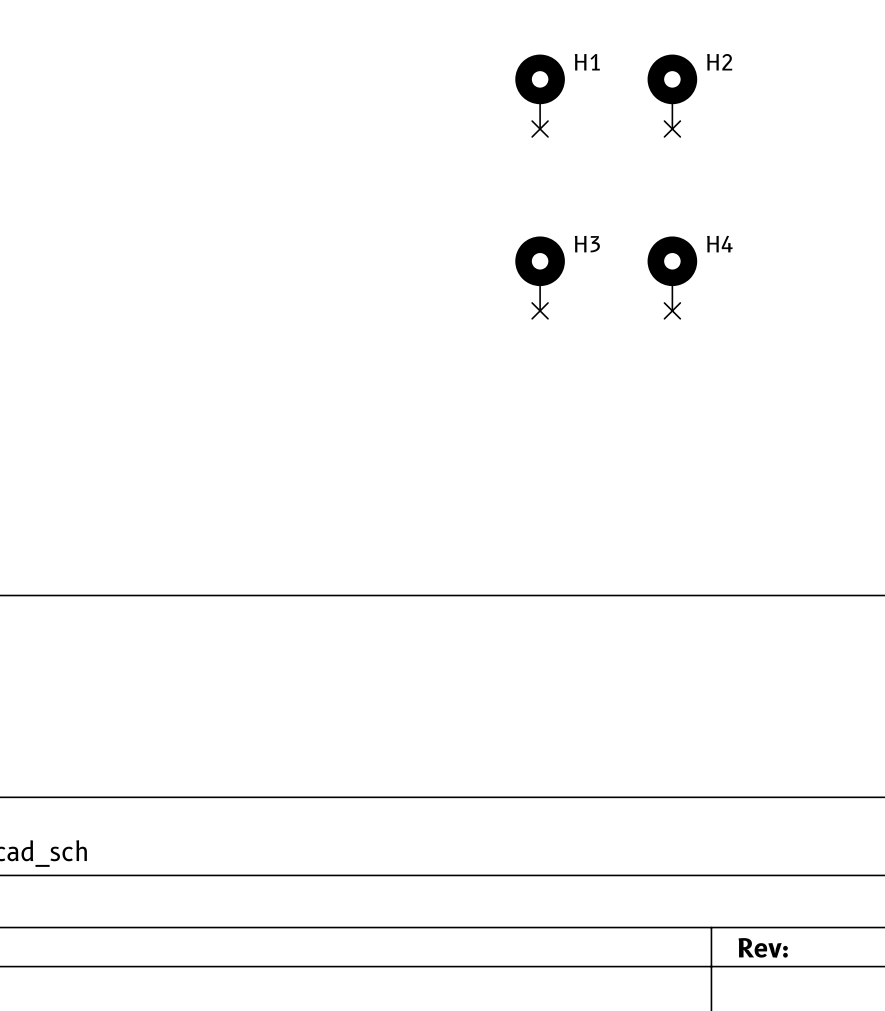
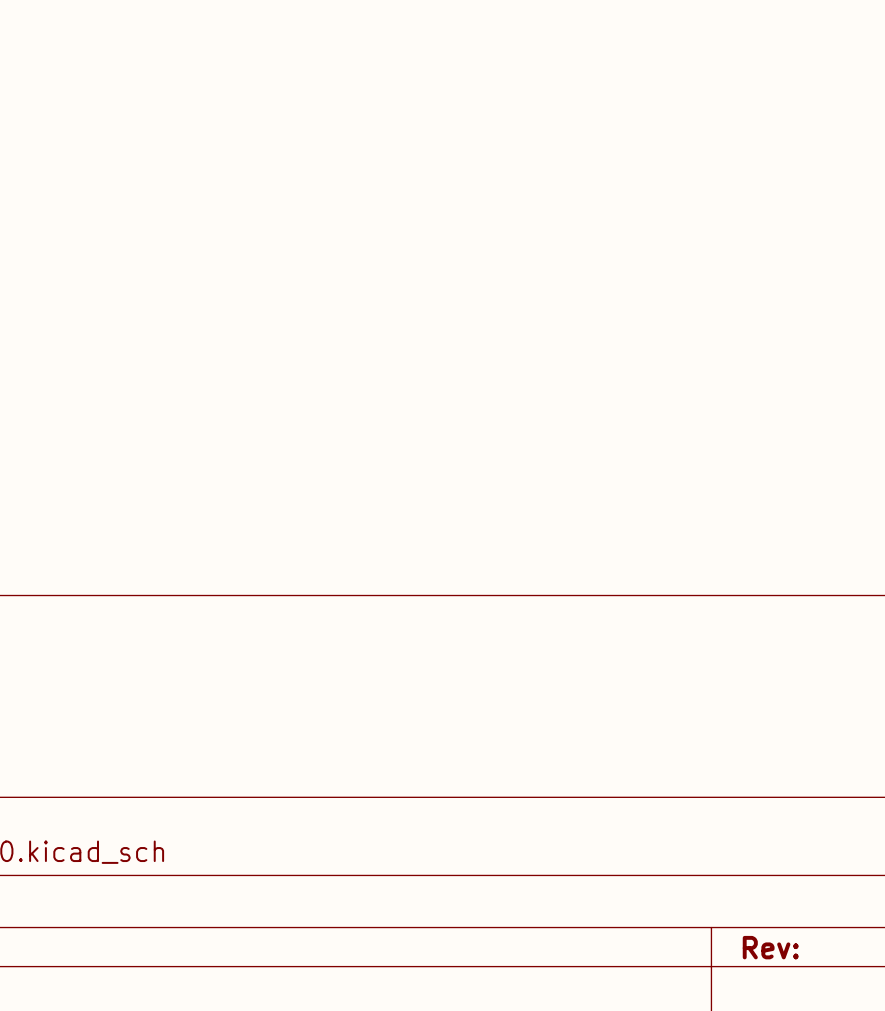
H1: (540, 91) -> none
H2: (672, 91) -> none
no-connect mark: (540, 128) -> none
no-connect mark: (672, 128) -> none
H3: (540, 273) -> none
H4: (672, 273) -> none
no-connect mark: (540, 310) -> none
no-connect mark: (672, 310) -> none

